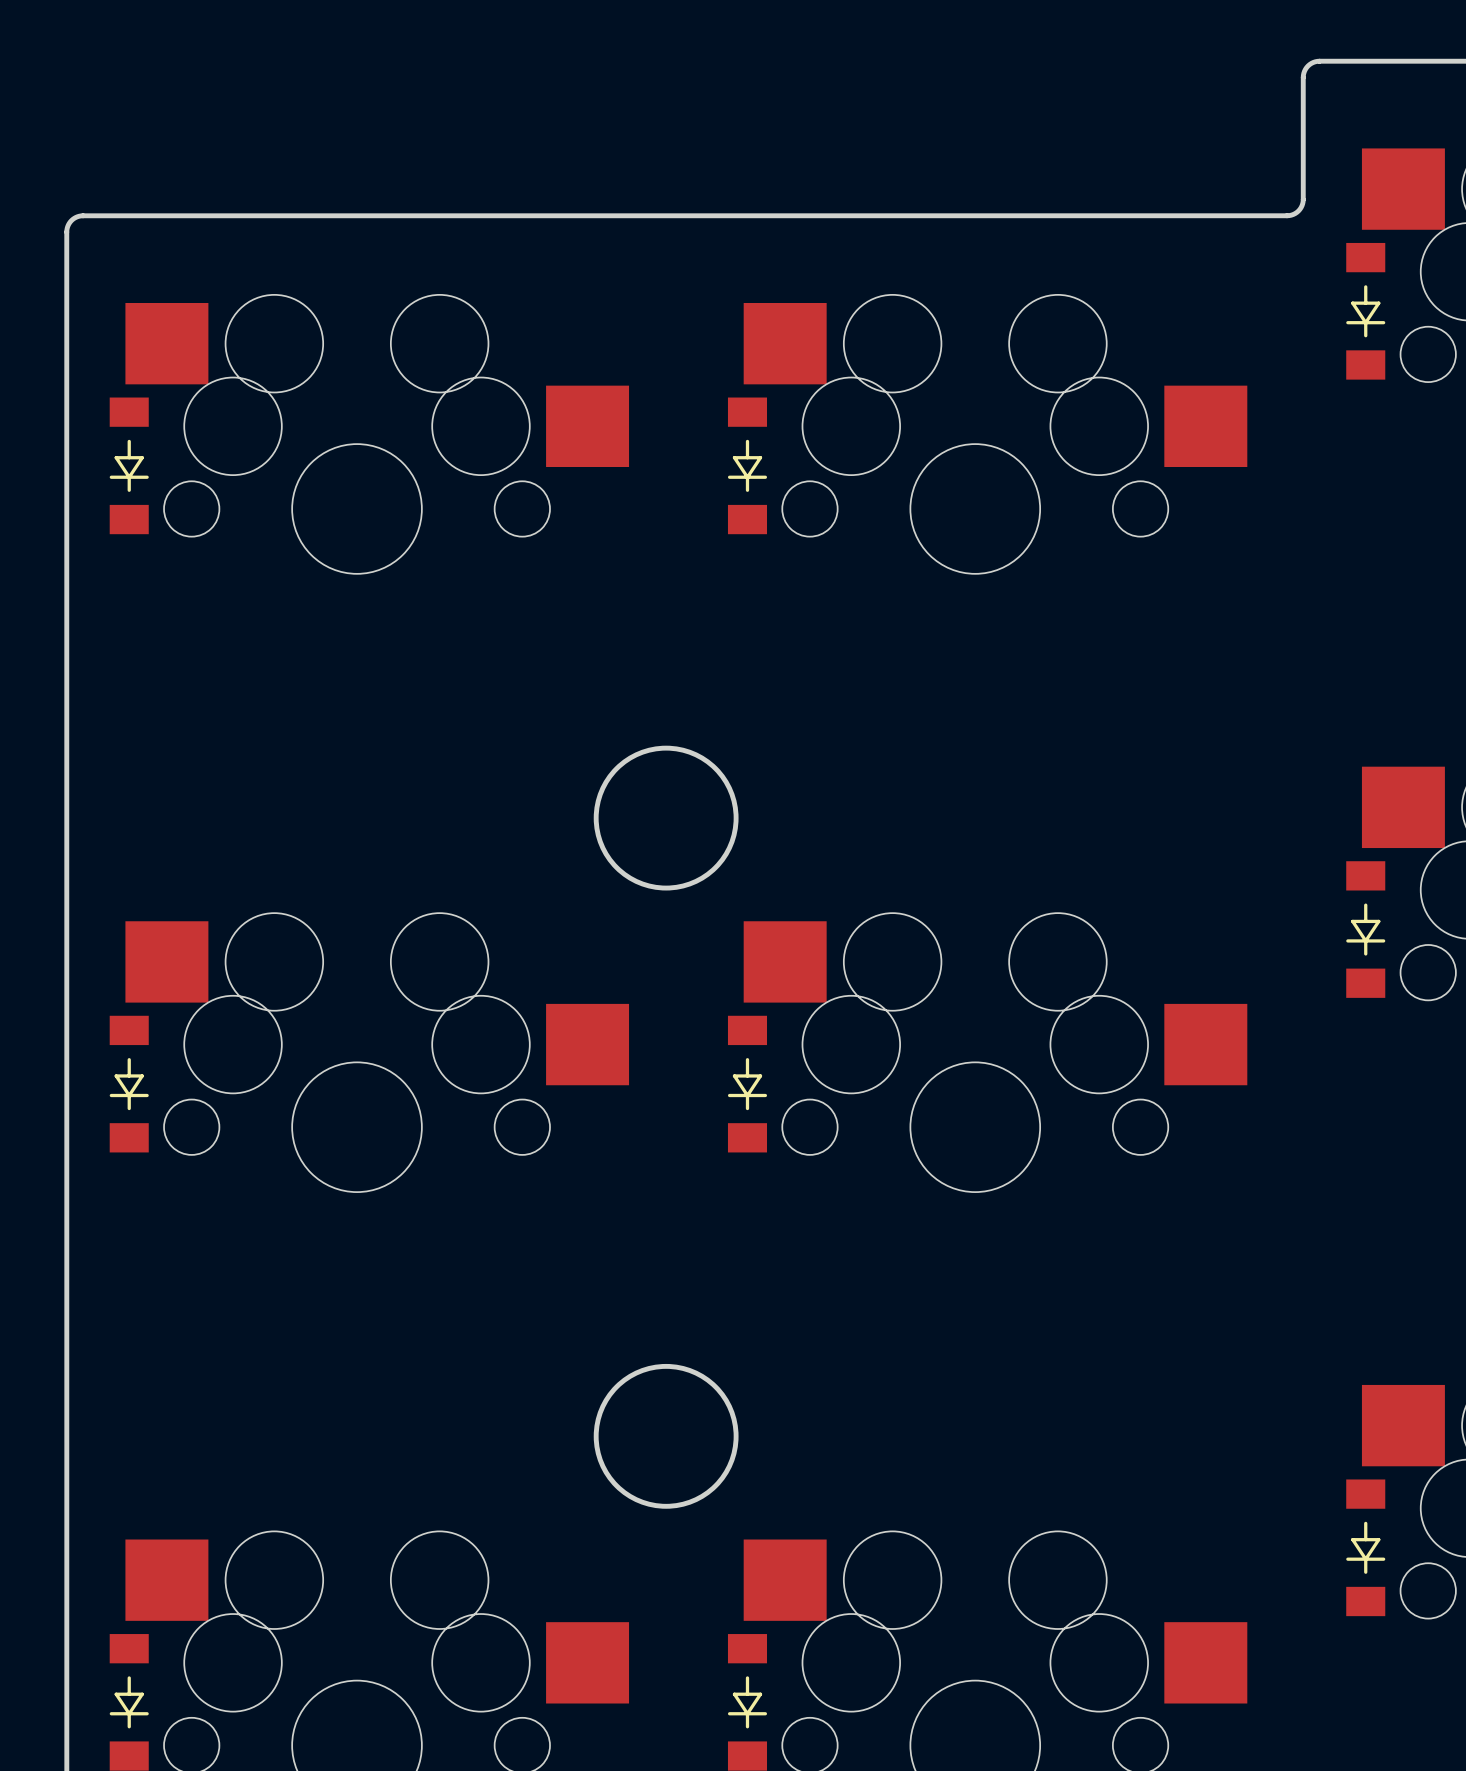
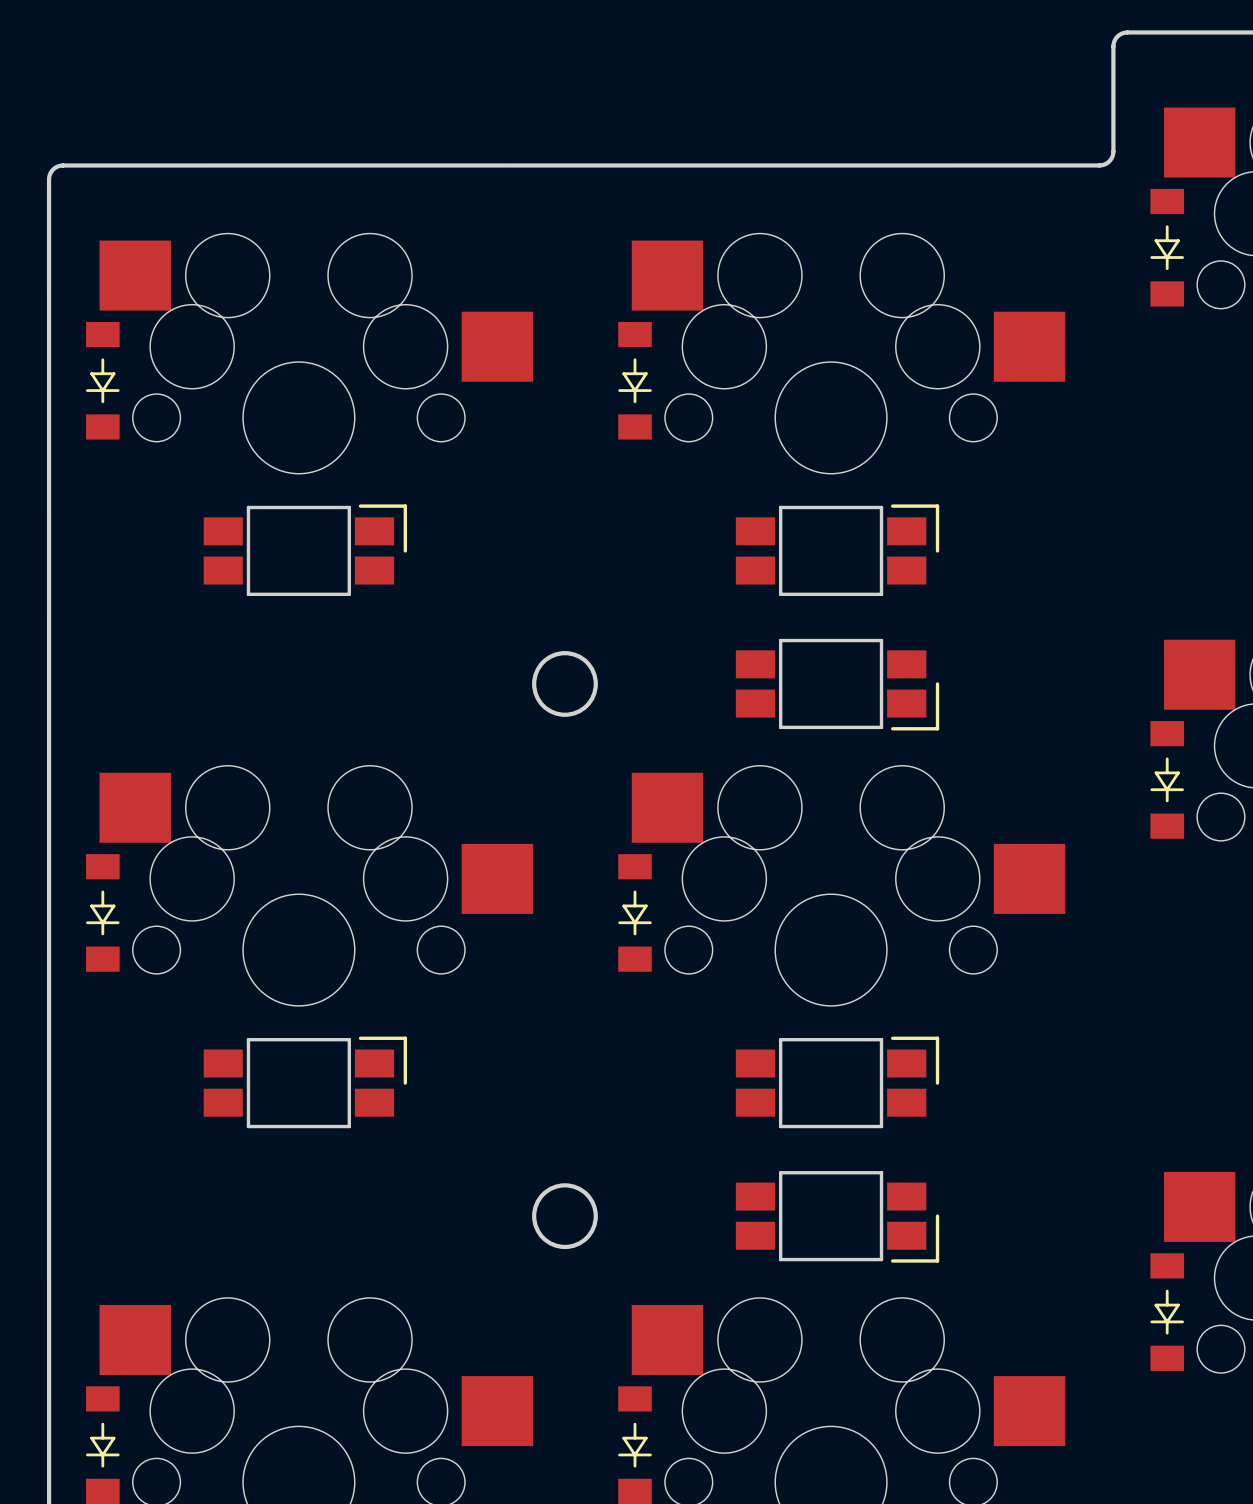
part: none -> (305, 550)
part: none -> (837, 550)
round board edge size: [593, 745, 739, 891] -> [532, 651, 598, 717]
part: none -> (837, 684)
part: none -> (305, 1082)
part: none -> (837, 1082)
round board edge size: [593, 1363, 739, 1509] -> [532, 1183, 598, 1250]
part: none -> (837, 1216)

